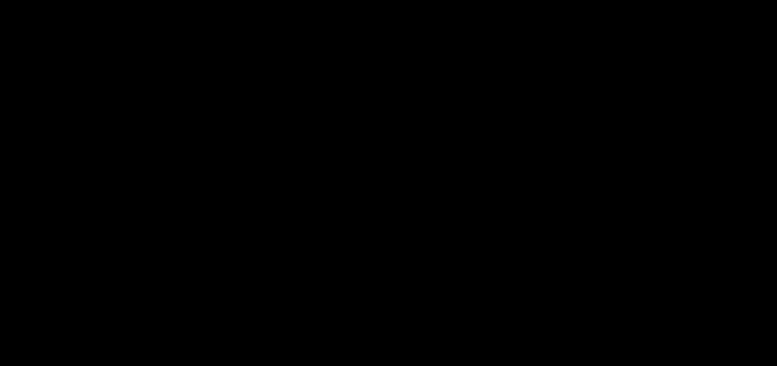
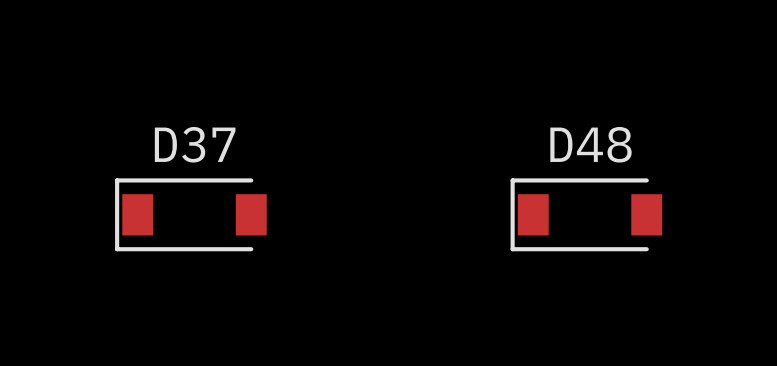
D37: none -> (190, 214)
D48: none -> (586, 214)

